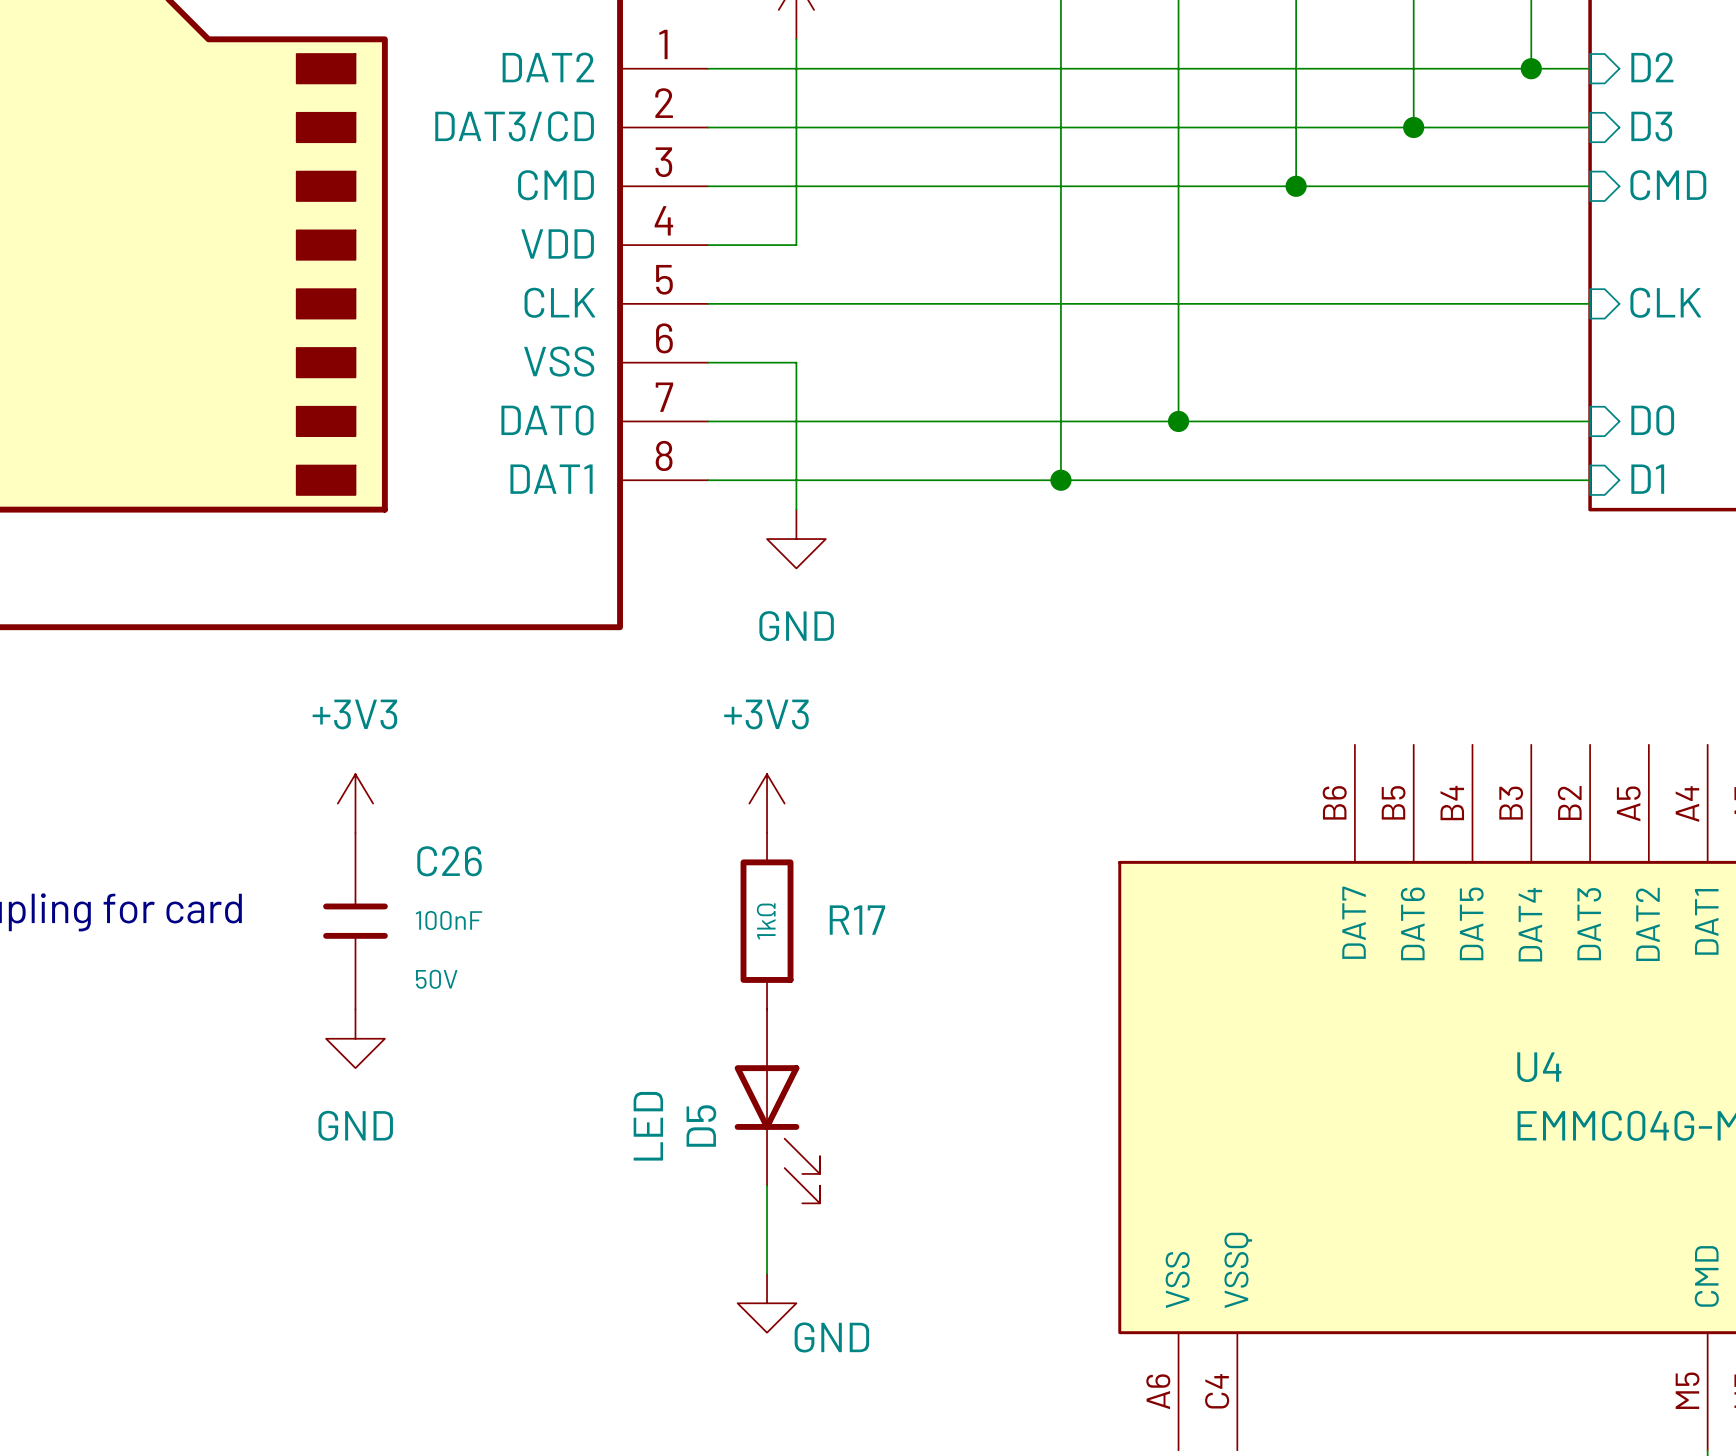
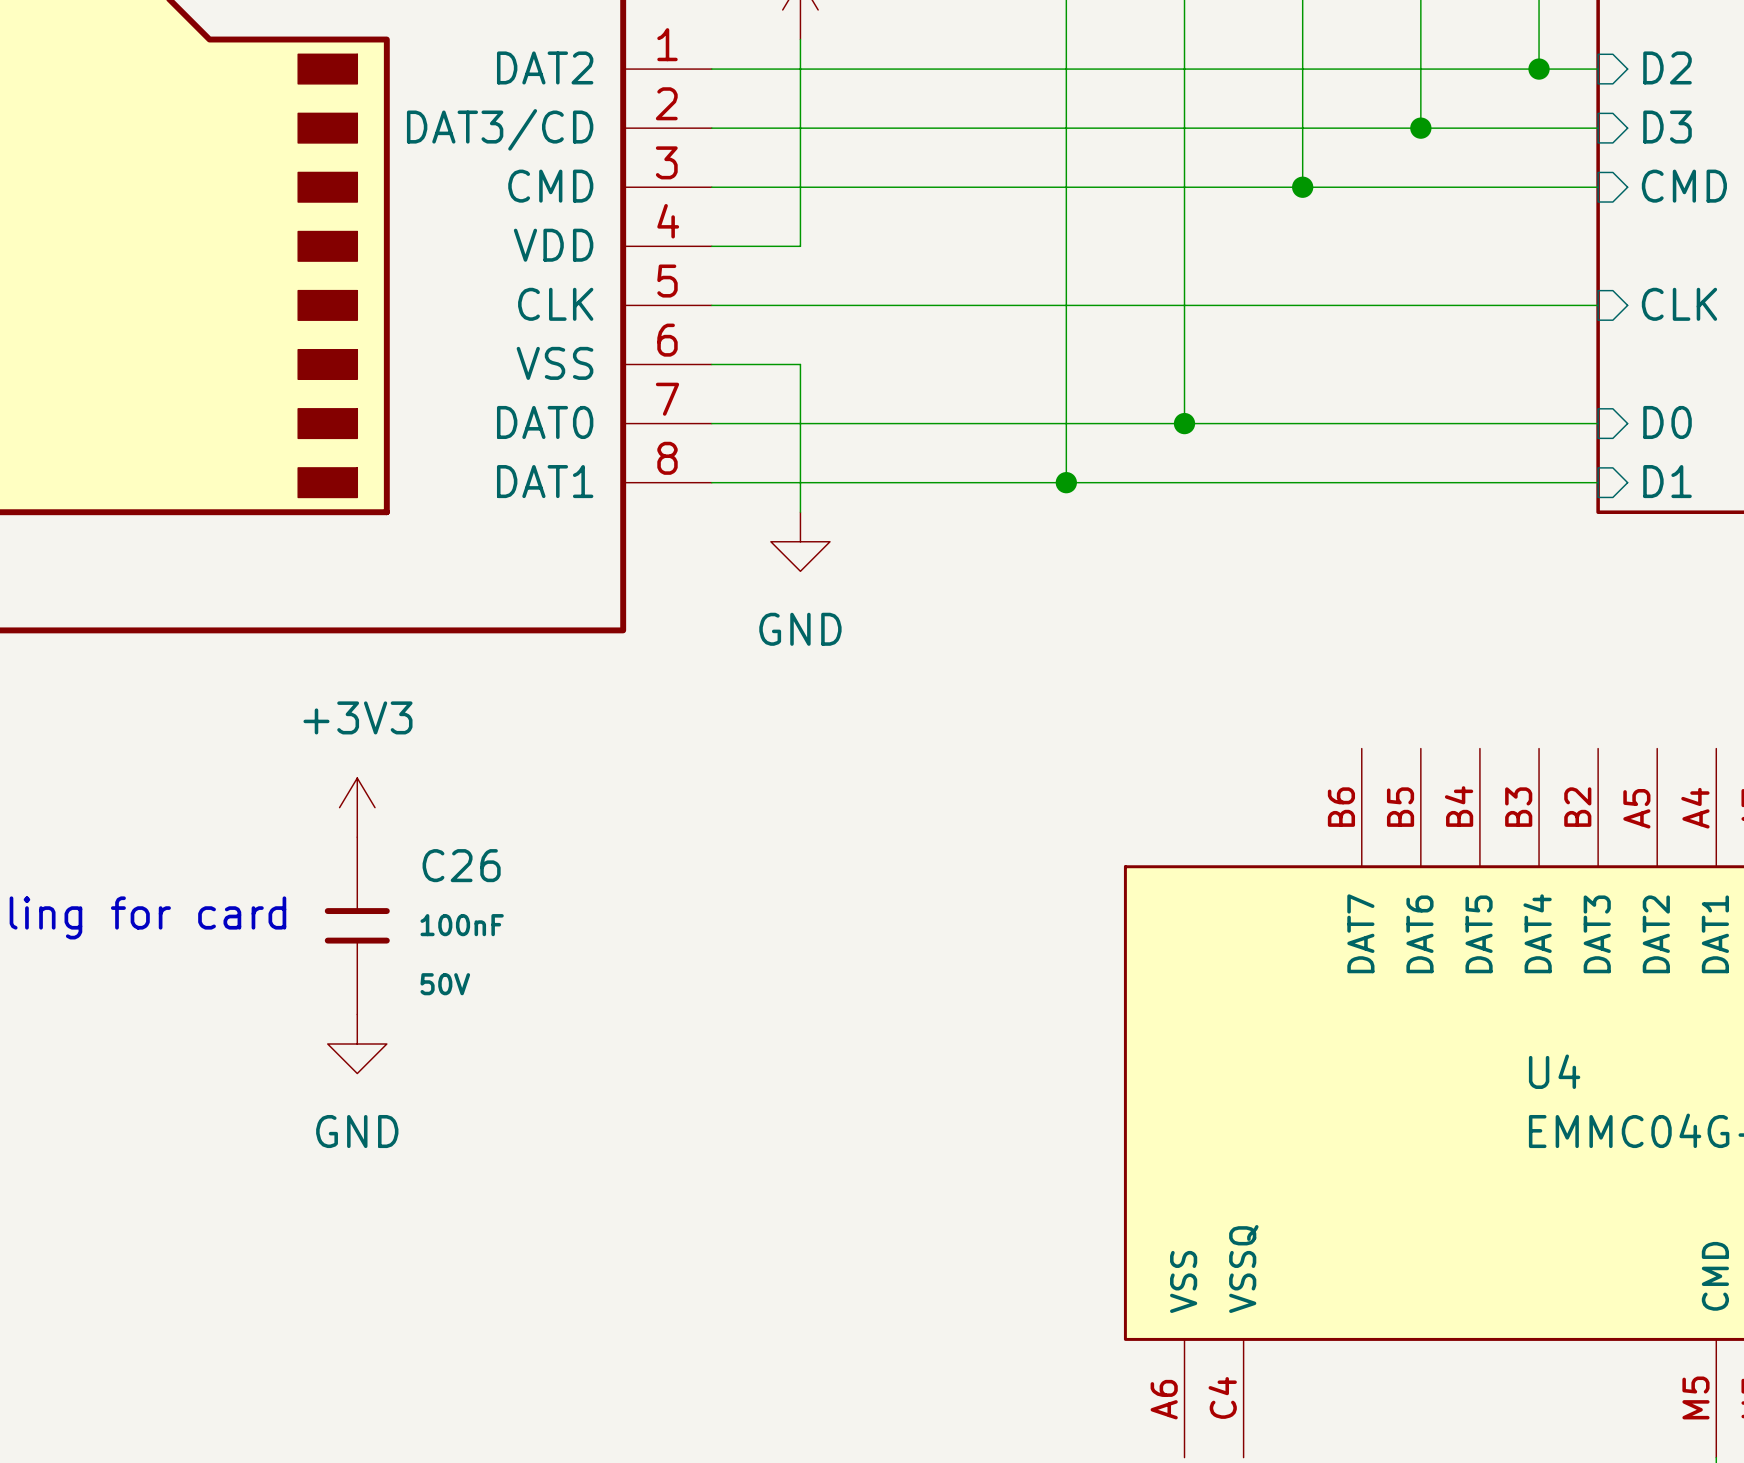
power symbol: +3V3 (767, 803) -> none
R17: 1kΩ (767, 921) -> none
D5: LED (777, 1106) -> none
wire: (767, 1185) (767, 1273) -> none
power symbol: GND (767, 1303) -> none

